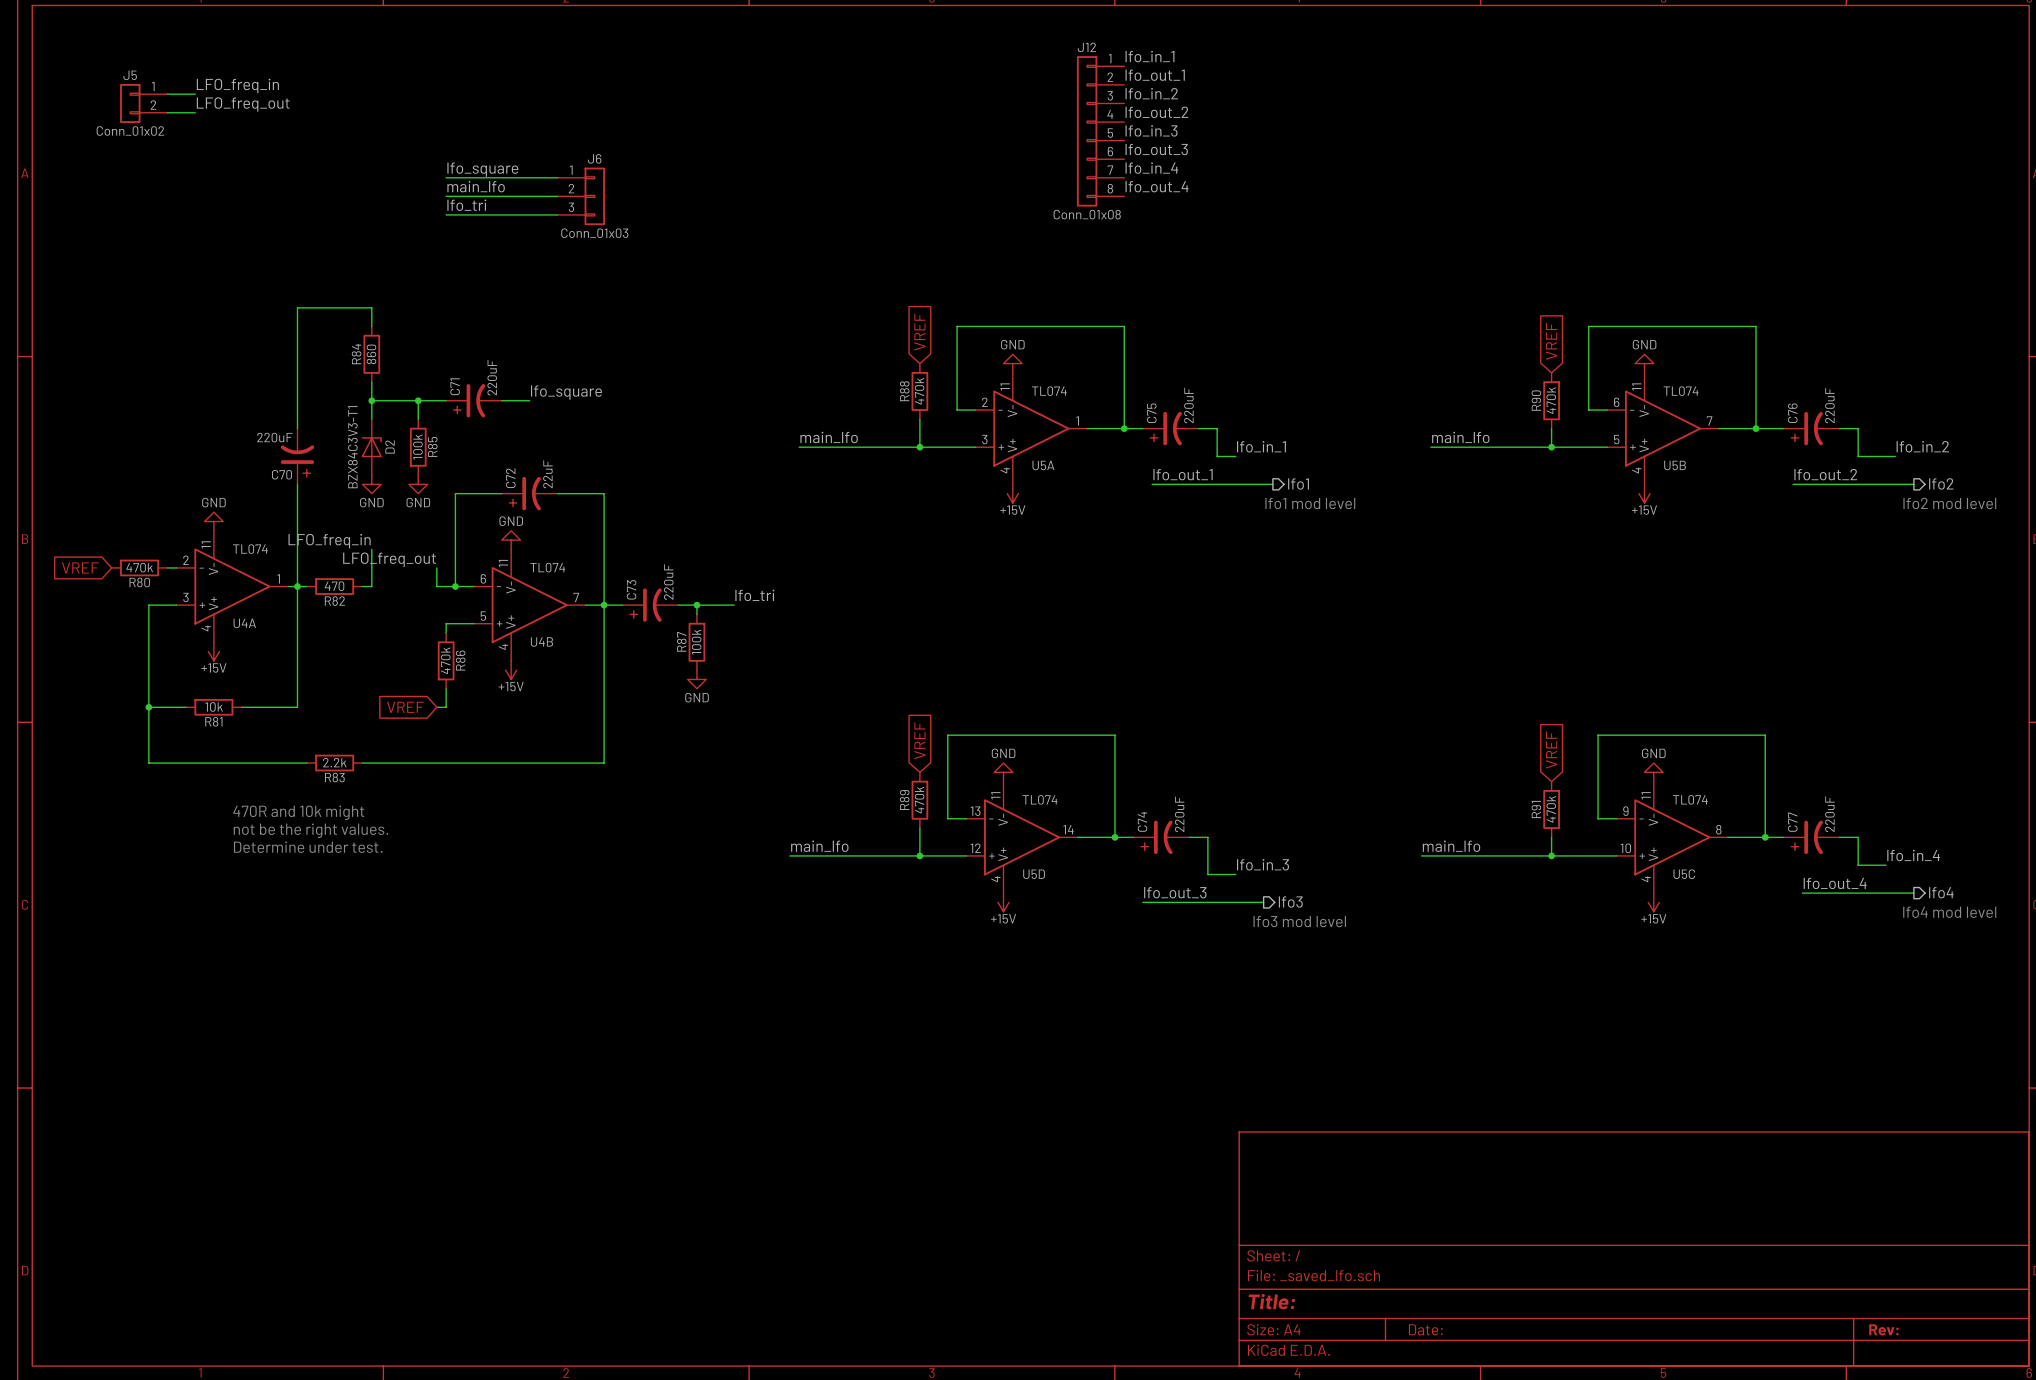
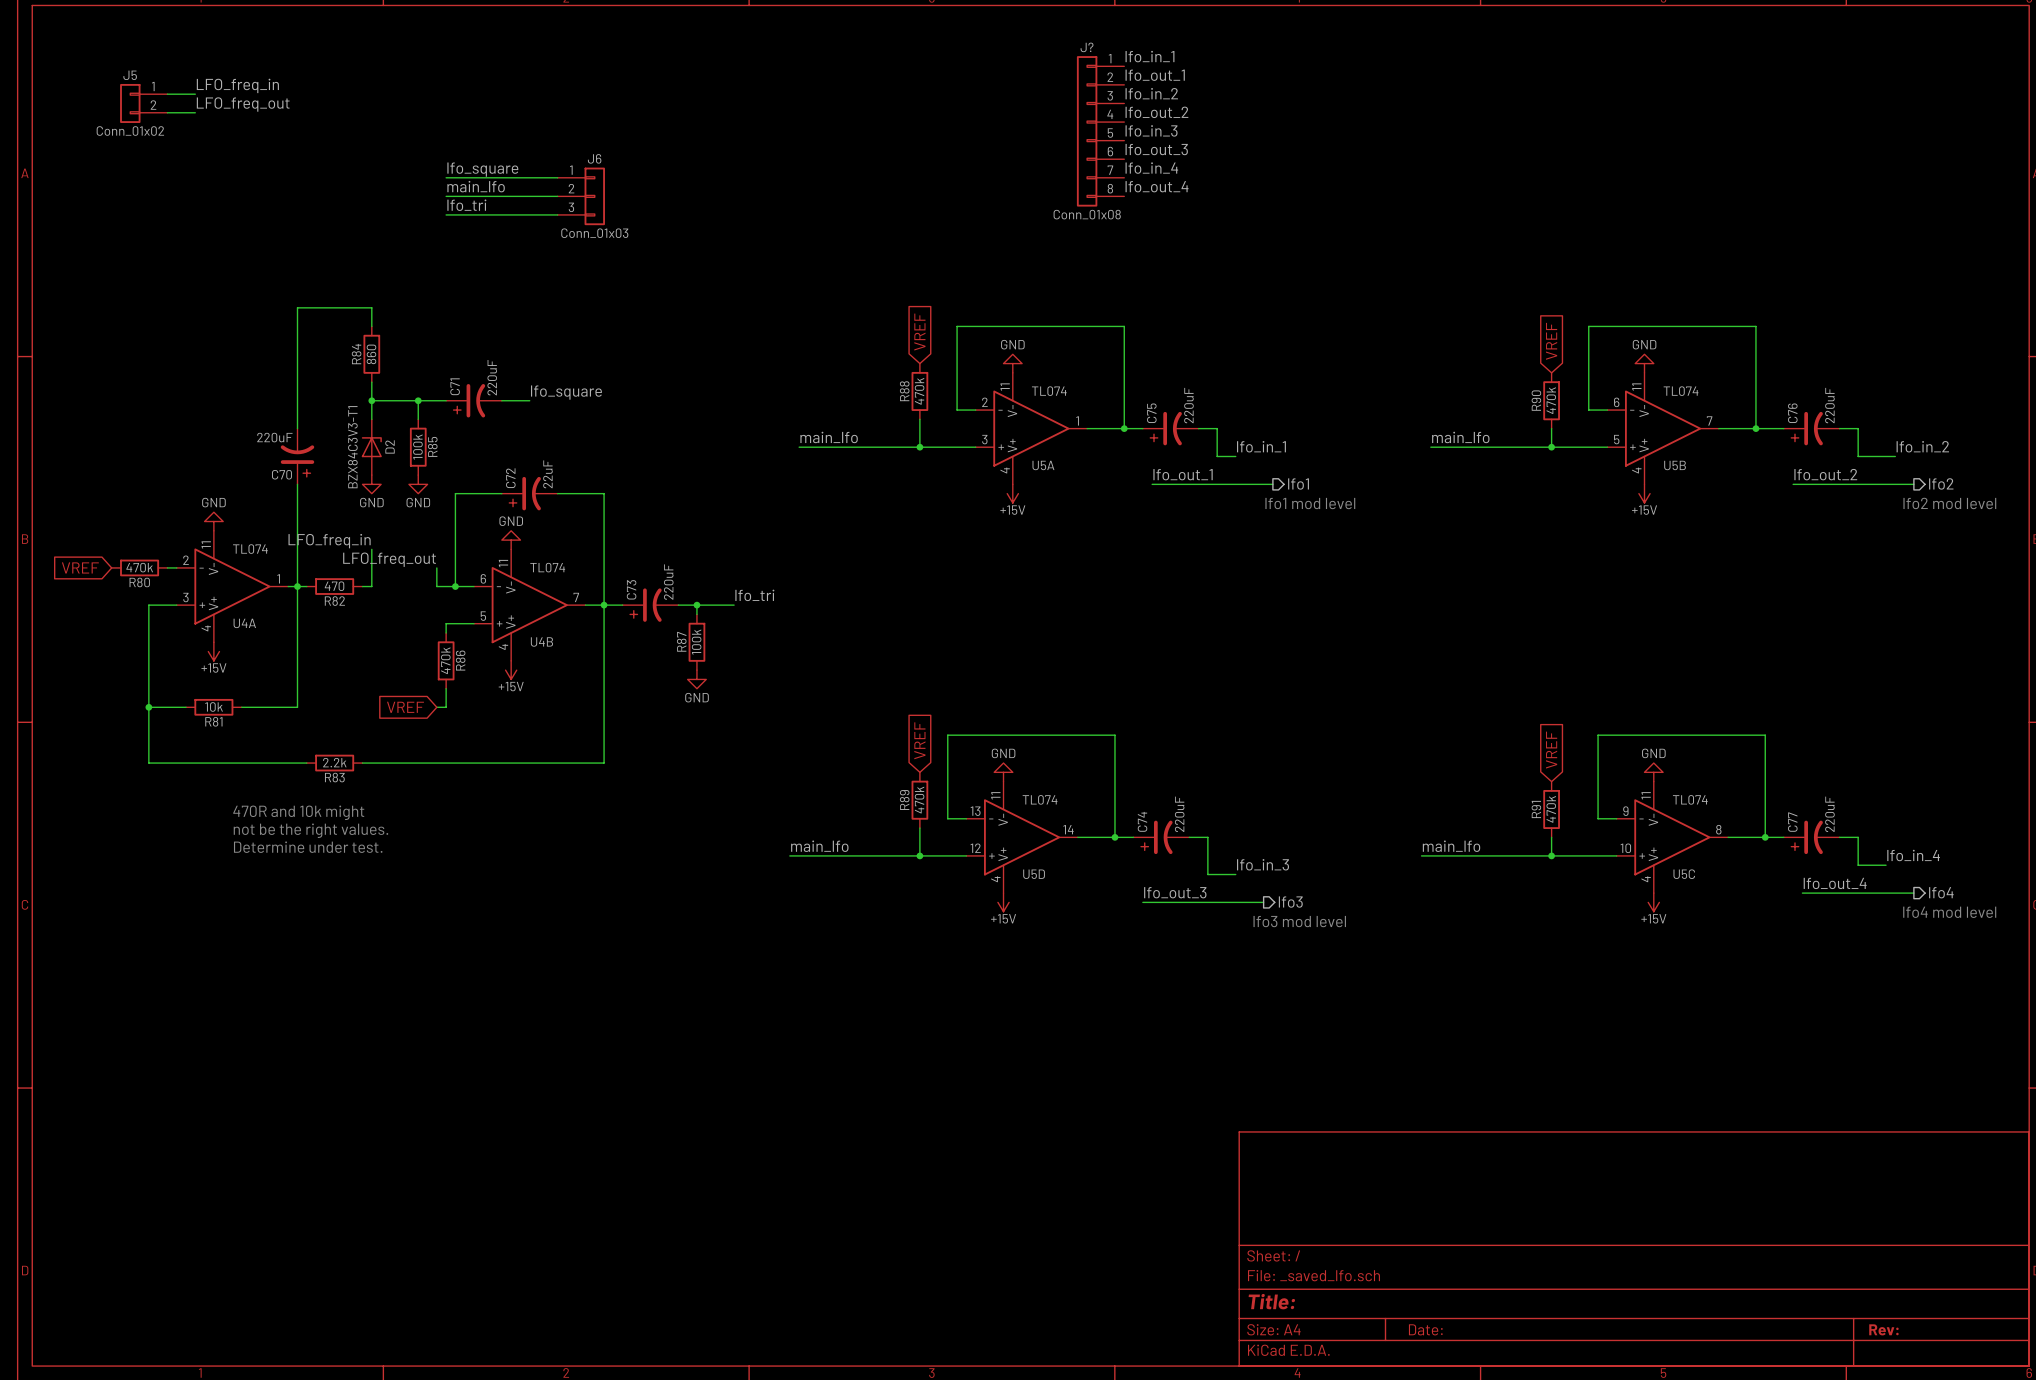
J12 name: J12 (1086, 47) -> J? (1087, 47)

